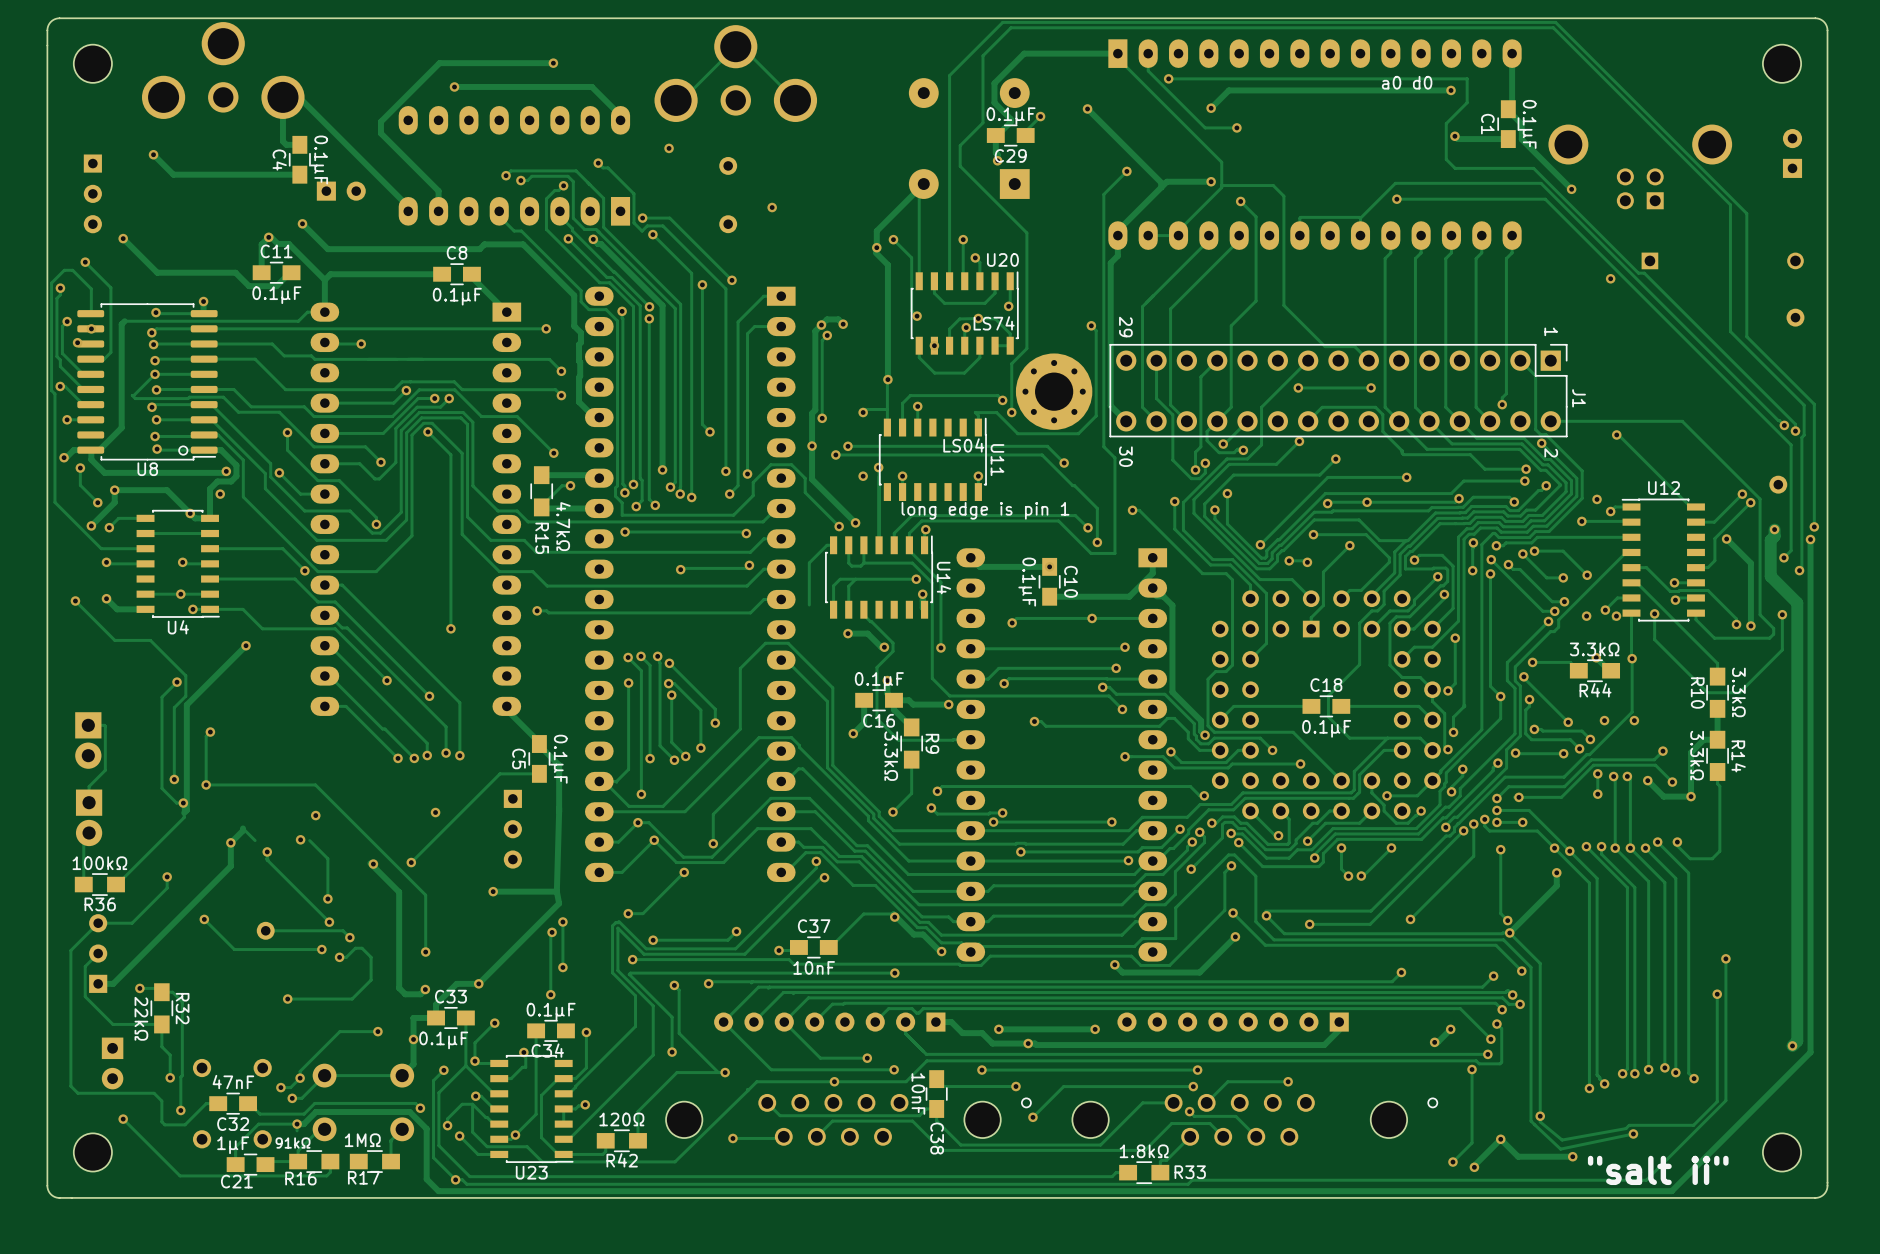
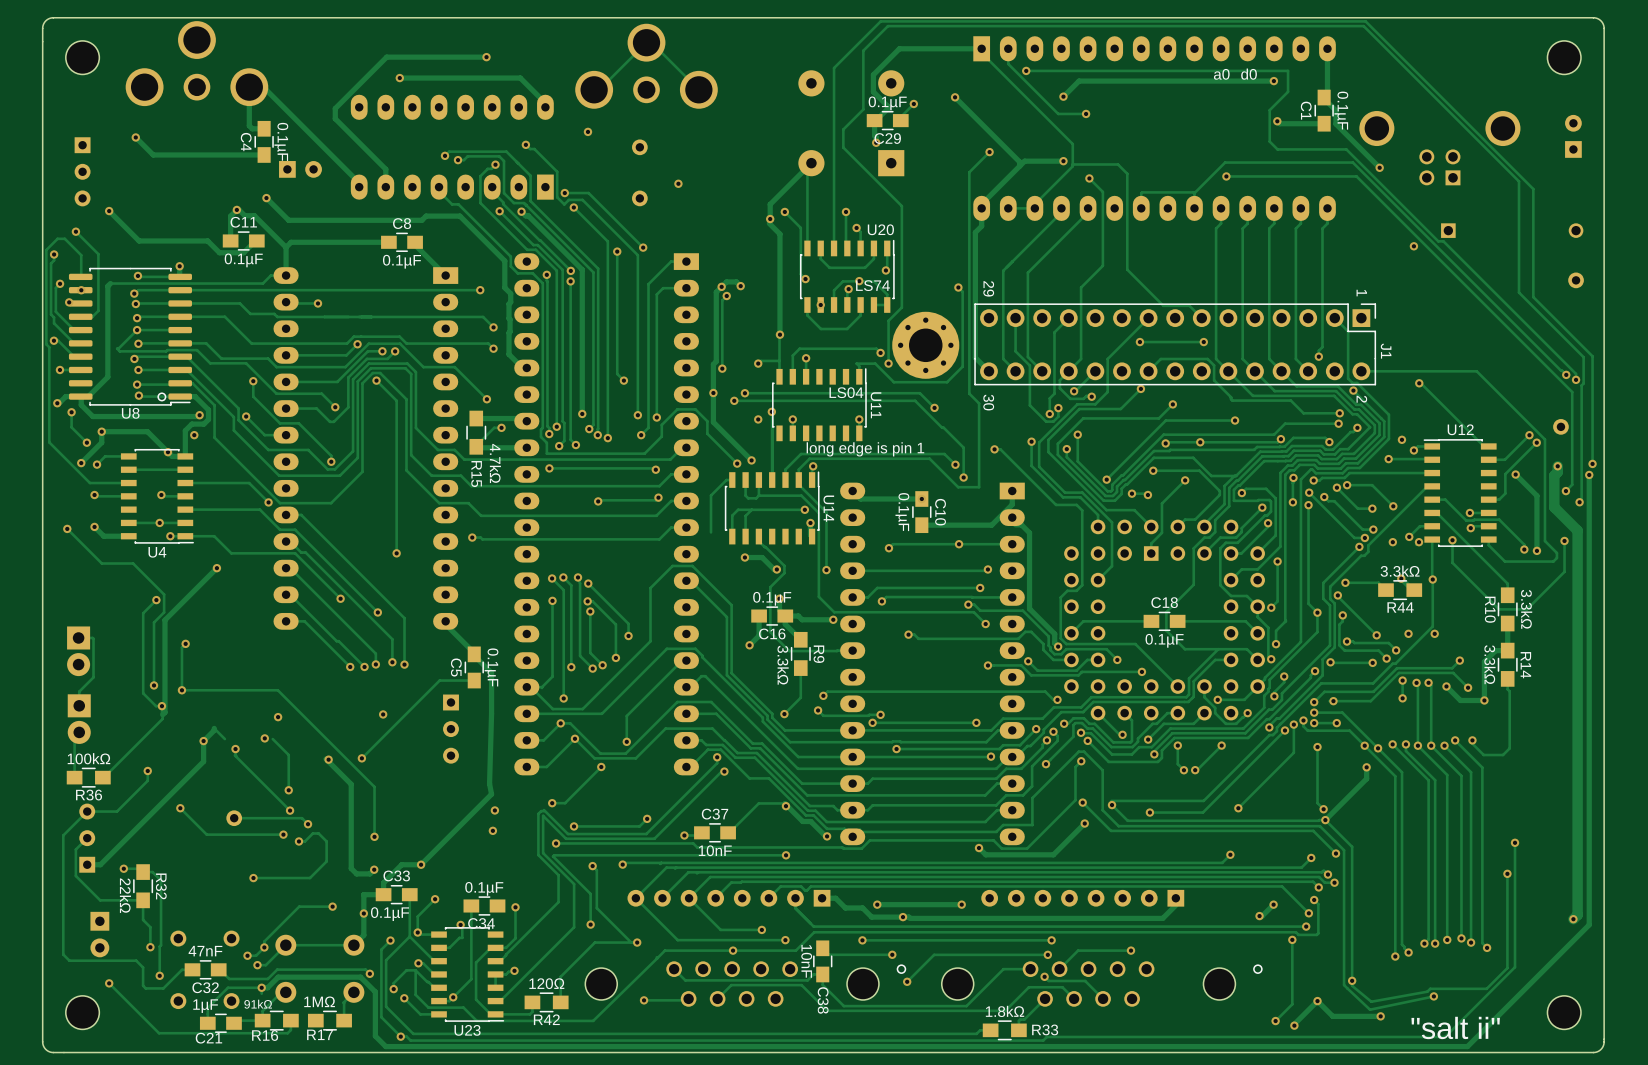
via: (493, 891) -> none
track: (556, 891) (493, 891) -> none
track: (562, 921) (562, 967) -> none
track: (552, 932) (550, 994) -> none
via: (552, 932) -> none
via: none -> (492, 830)
via: (562, 967) -> none
via: (550, 994) -> none

